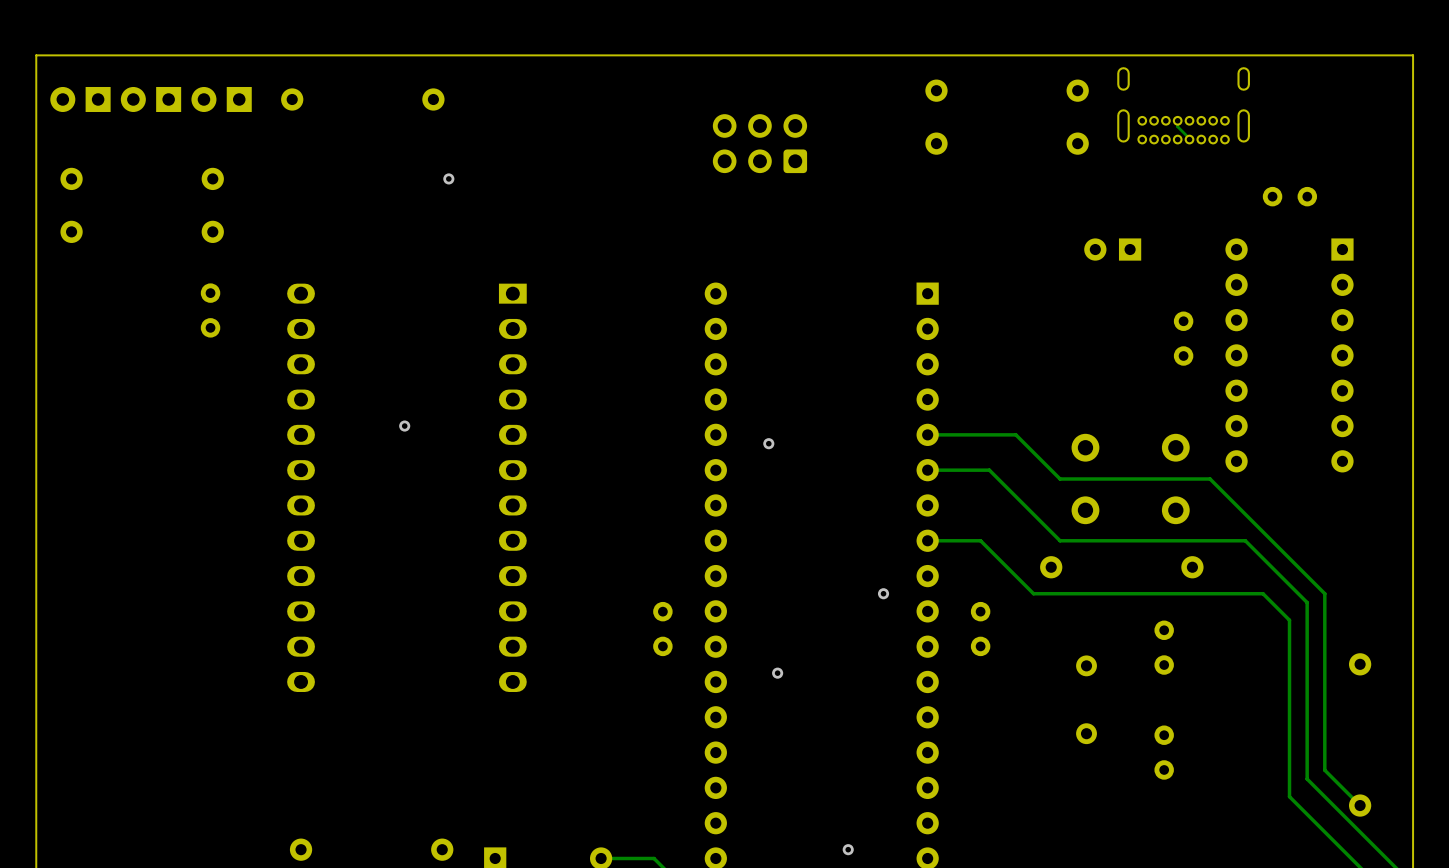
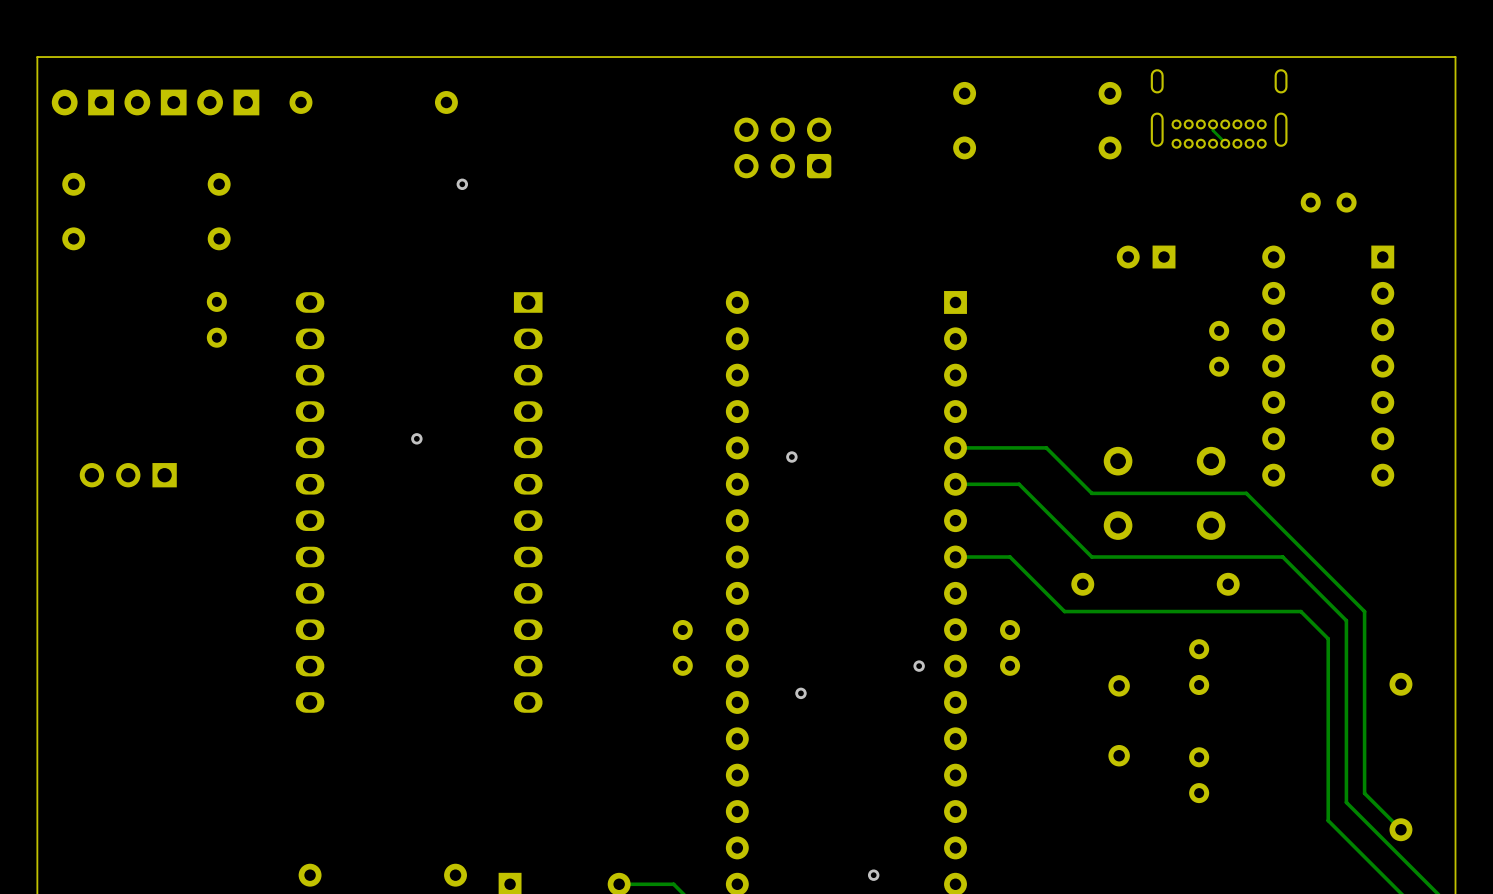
part: none -> (128, 475)
via position: (883, 593) -> (919, 666)

